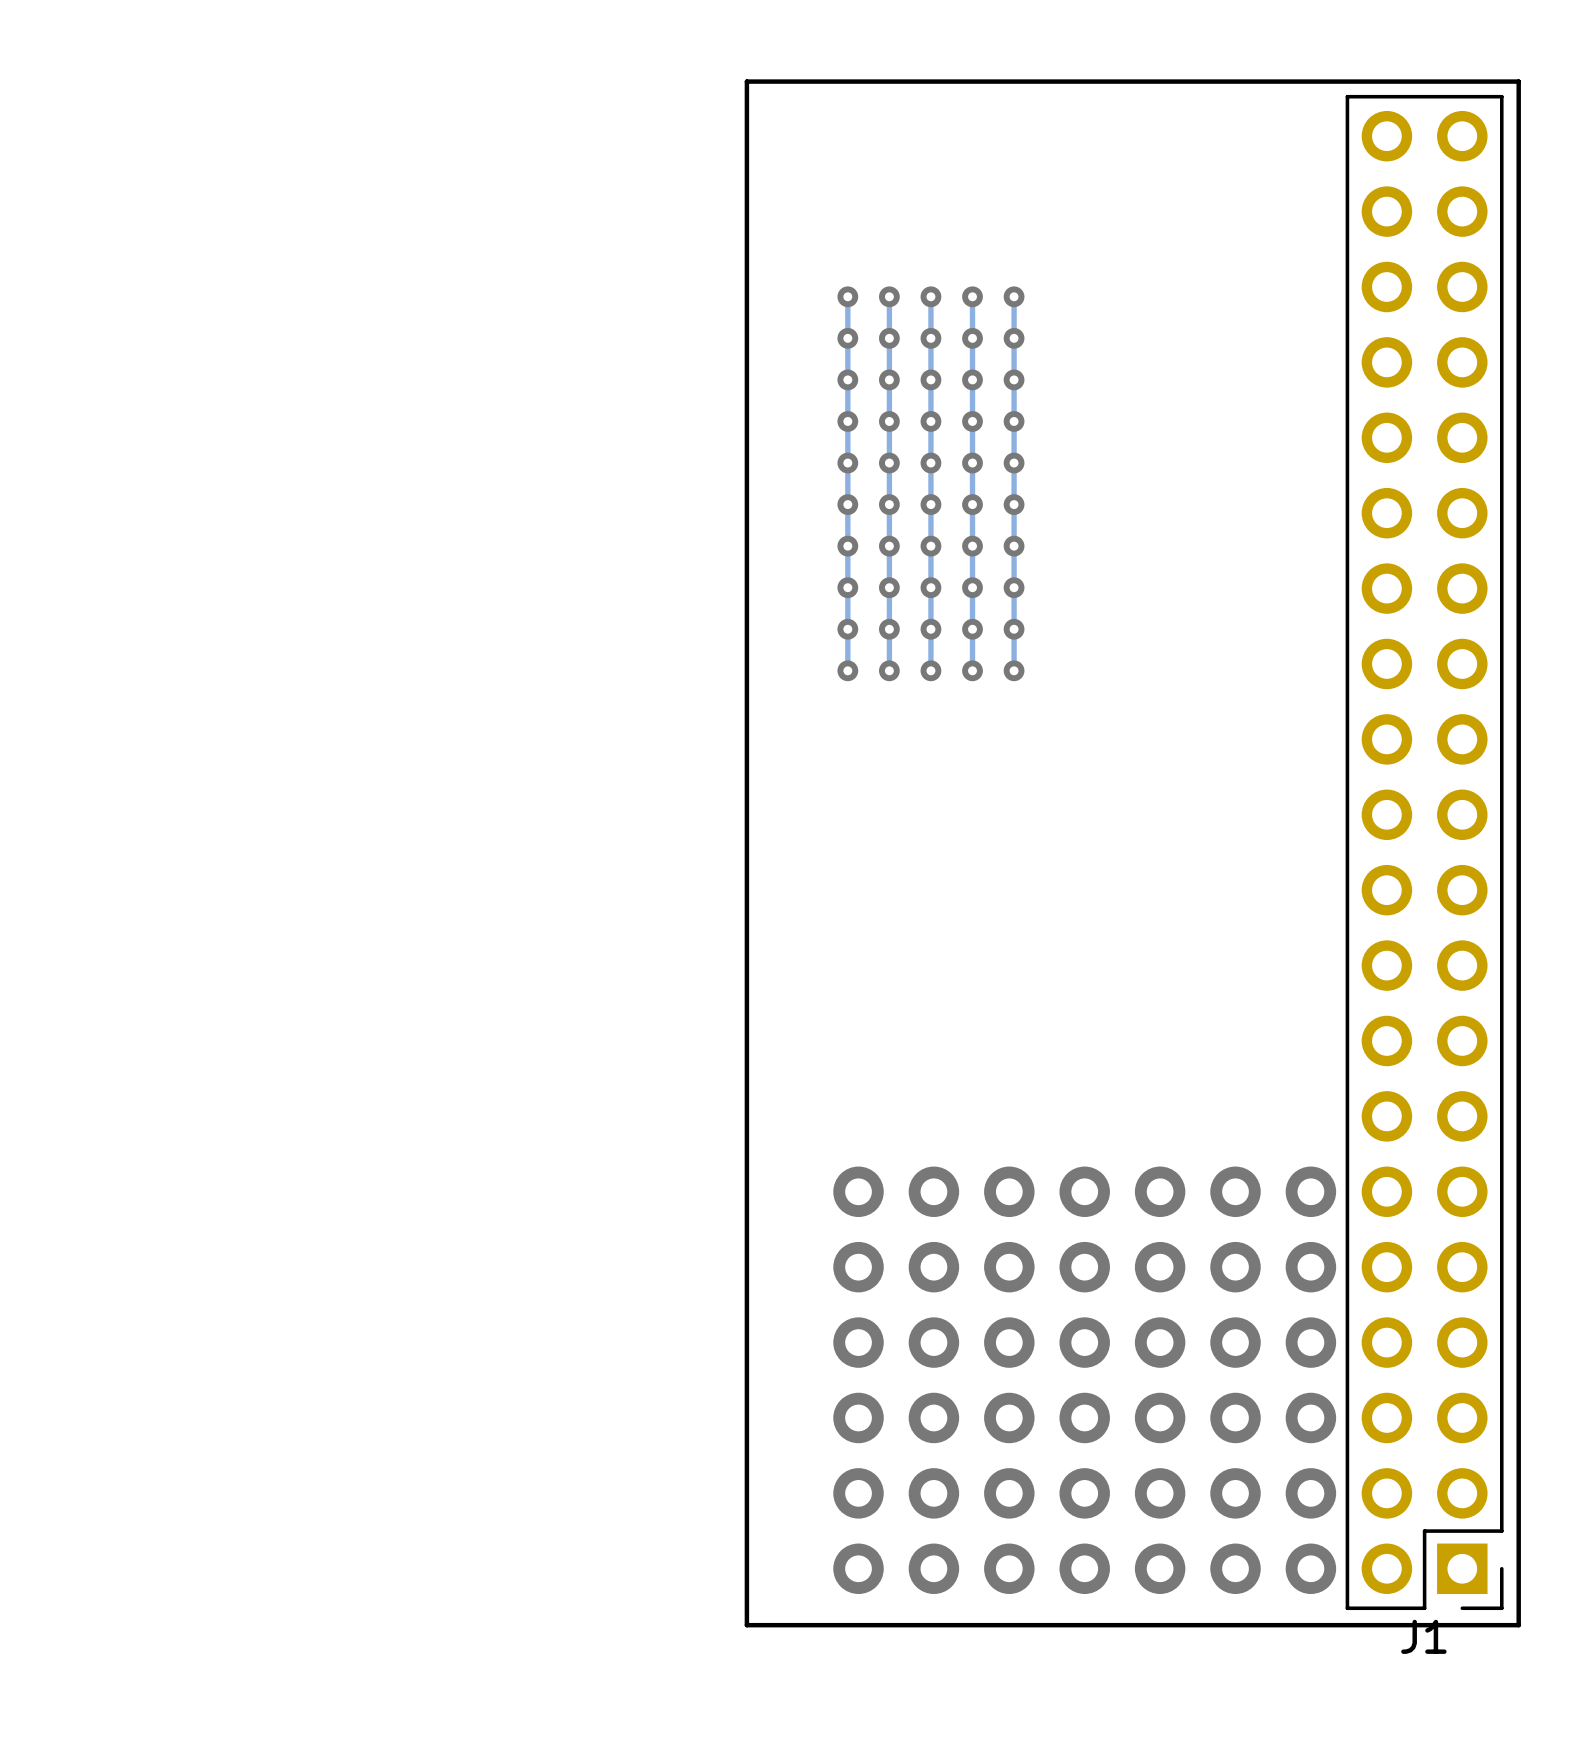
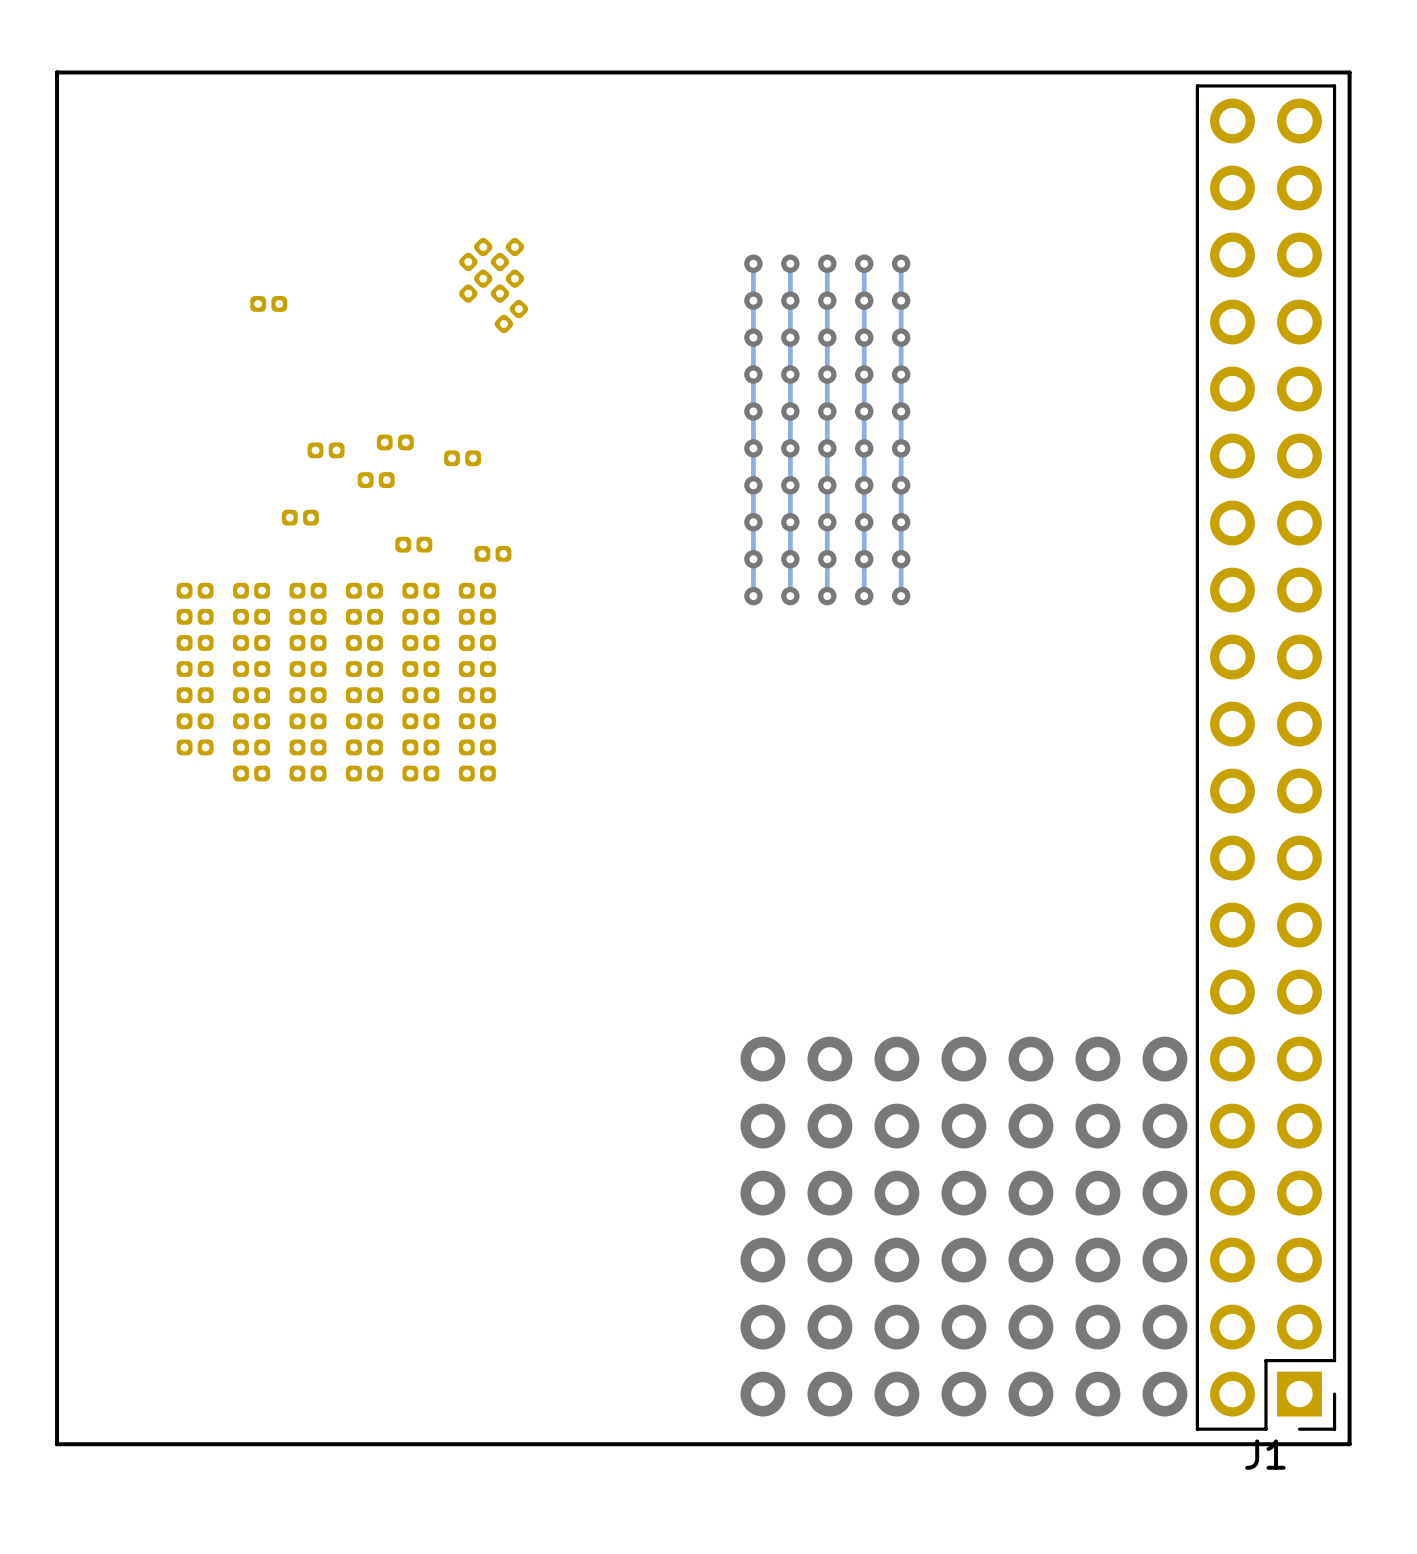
board edge: (746, 81) (746, 1625) -> (663, 72) (57, 72) (57, 1444) (663, 1444)
part: none -> (475, 254)
part: none -> (507, 254)
part: none -> (475, 286)
part: none -> (507, 286)
part: none -> (268, 303)
part: none -> (511, 316)
part: none -> (395, 442)
part: none -> (326, 450)
part: none -> (462, 458)
part: none -> (376, 480)
part: none -> (300, 517)
part: none -> (413, 544)
part: none -> (492, 553)
part: none -> (195, 590)
part: none -> (251, 590)
part: none -> (308, 590)
part: none -> (364, 590)
part: none -> (420, 590)
part: none -> (477, 590)
part: none -> (195, 616)
part: none -> (251, 616)
part: none -> (308, 616)
part: none -> (364, 616)
part: none -> (420, 616)
part: none -> (477, 616)
part: none -> (195, 642)
part: none -> (251, 642)
part: none -> (308, 642)
part: none -> (364, 642)
part: none -> (420, 642)
part: none -> (477, 642)
part: none -> (195, 669)
part: none -> (251, 669)
part: none -> (308, 669)
part: none -> (364, 669)
part: none -> (420, 669)
part: none -> (477, 669)
part: none -> (195, 695)
part: none -> (251, 695)
part: none -> (308, 695)
part: none -> (364, 695)
part: none -> (420, 695)
part: none -> (477, 695)
part: none -> (195, 721)
part: none -> (251, 721)
part: none -> (308, 721)
part: none -> (364, 721)
part: none -> (420, 721)
part: none -> (477, 721)
part: none -> (195, 747)
part: none -> (251, 747)
part: none -> (308, 747)
part: none -> (364, 747)
part: none -> (420, 747)
part: none -> (477, 747)
part: none -> (251, 773)
part: none -> (308, 773)
part: none -> (364, 773)
part: none -> (420, 773)
part: none -> (477, 773)

